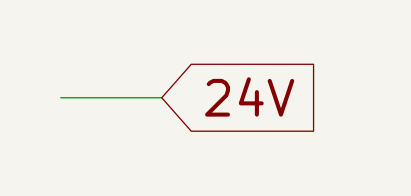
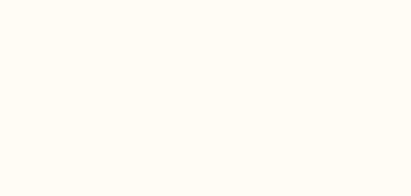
global label: 24V (249, 96) -> none
wire: (60, 97) (161, 97) -> none

